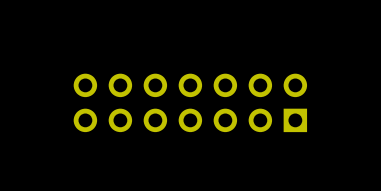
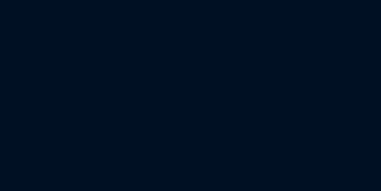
part: (190, 102) -> none

